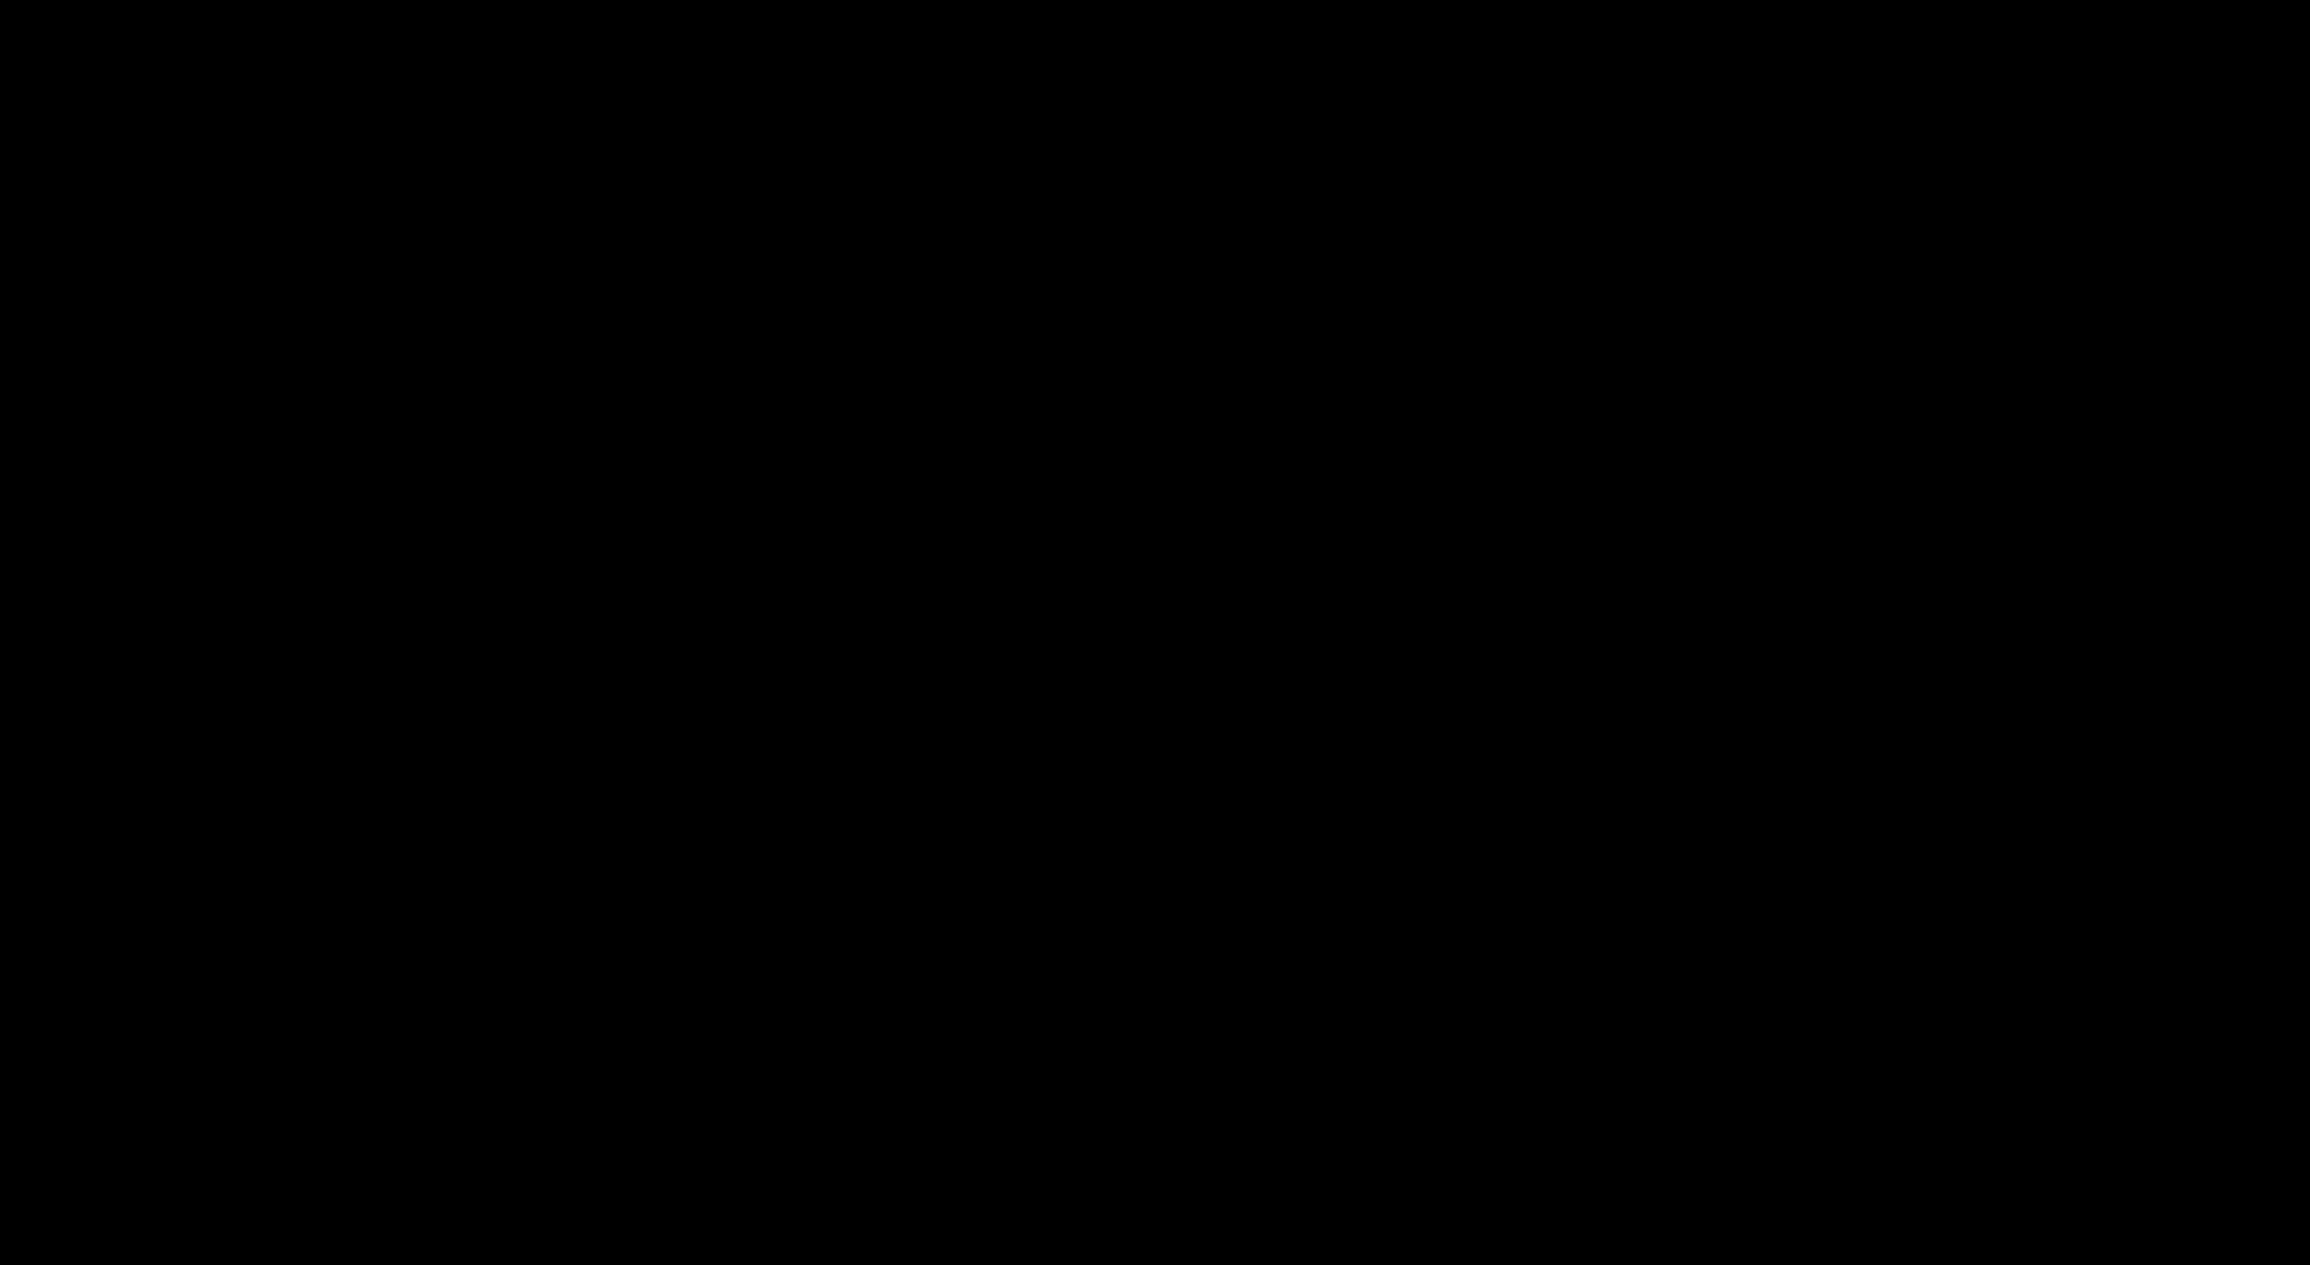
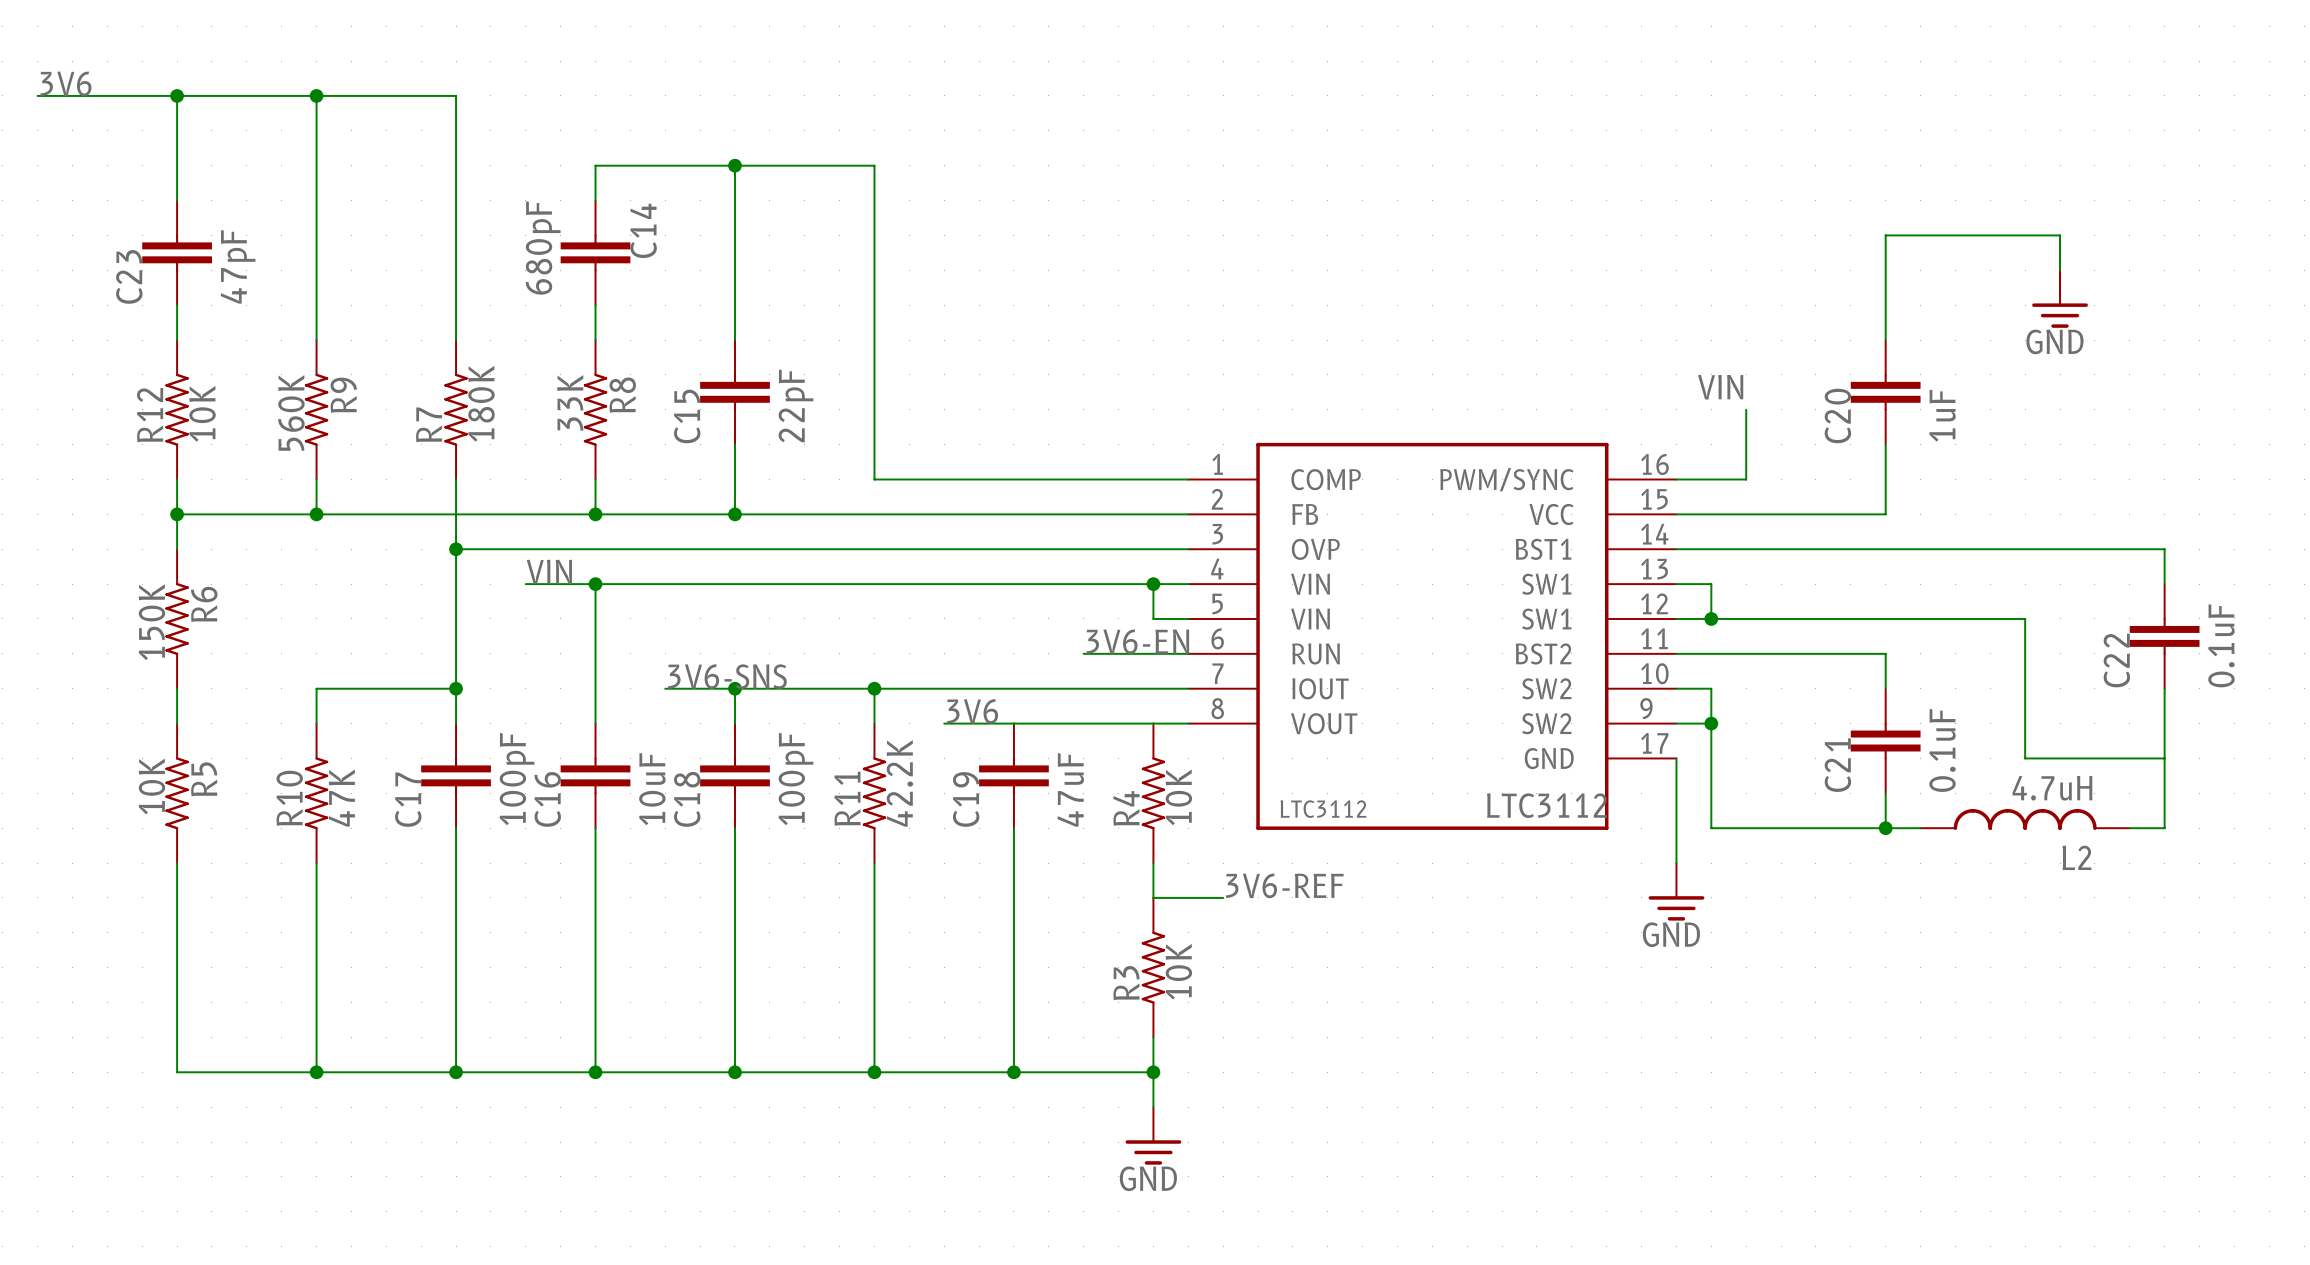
label: none -> 3V6 (65, 83)
wire: none -> (37, 95) (456, 95) (456, 340)
wire: none -> (177, 95) (177, 200)
junction: none -> (177, 95)
wire: none -> (316, 95) (316, 340)
junction: none -> (316, 95)
wire: none -> (734, 165) (734, 340)
junction: none -> (734, 165)
wire: none -> (595, 200) (595, 165) (874, 165) (874, 479) (1188, 479)
C23: none -> 47pF (177, 252)
C14: none -> 680pF (595, 252)
wire: none -> (2060, 270) (2060, 235) (1885, 235) (1885, 340)
power symbol: none -> GND (2060, 299)
wire: none -> (177, 305) (177, 340)
wire: none -> (595, 305) (595, 340)
label: none -> VIN (1720, 387)
C15: none -> 22pF (734, 392)
C20: none -> 1uF (1885, 392)
R12: none -> 10K (177, 409)
R9: none -> 560K (316, 409)
R7: none -> 180K (456, 409)
R8: none -> 33K (595, 409)
wire: none -> (1746, 409) (1746, 479) (1676, 479)
wire: none -> (734, 444) (734, 514)
wire: none -> (1885, 444) (1885, 514) (1676, 514)
wire: none -> (177, 479) (177, 549)
wire: none -> (316, 479) (316, 514)
wire: none -> (456, 479) (456, 723)
wire: none -> (595, 479) (595, 514)
wire: none -> (177, 514) (1188, 514)
junction: none -> (177, 514)
junction: none -> (316, 514)
junction: none -> (595, 514)
junction: none -> (734, 514)
wire: none -> (456, 549) (1188, 549)
junction: none -> (456, 549)
wire: none -> (1676, 549) (2164, 549) (2164, 584)
label: none -> VIN (549, 572)
wire: none -> (525, 584) (1188, 584)
wire: none -> (595, 584) (595, 723)
junction: none -> (595, 584)
wire: none -> (1153, 584) (1153, 618) (1188, 618)
junction: none -> (1153, 584)
wire: none -> (1676, 584) (1711, 584) (1711, 618)
R6: none -> 150K (177, 618)
wire: none -> (1676, 618) (2025, 618) (2025, 758) (2164, 758)
junction: none -> (1711, 618)
LTC3112: none -> (1432, 636)
C22: none -> 0.1uF (2164, 636)
label: none -> 3V6-EN (1137, 641)
wire: none -> (1083, 653) (1188, 653)
wire: none -> (1676, 653) (1885, 653) (1885, 688)
label: none -> 3V6-SNS (727, 676)
wire: none -> (177, 688) (177, 723)
wire: none -> (456, 688) (316, 688) (316, 723)
junction: none -> (456, 688)
wire: none -> (665, 688) (1188, 688)
wire: none -> (734, 688) (734, 723)
junction: none -> (734, 688)
wire: none -> (874, 688) (874, 723)
junction: none -> (874, 688)
wire: none -> (1676, 688) (1711, 688) (1711, 828) (1920, 828)
wire: none -> (2164, 688) (2164, 828) (2129, 828)
label: none -> 3V6 (972, 711)
wire: none -> (944, 723) (1188, 723)
wire: none -> (1676, 723) (1711, 723)
junction: none -> (1711, 723)
C21: none -> 0.1uF (1885, 741)
wire: none -> (1676, 758) (1676, 863)
C17: none -> 100pF (456, 775)
C16: none -> 10uF (595, 775)
C18: none -> 100pF (734, 775)
C19: none -> 47uF (1013, 775)
R5: none -> 10K (177, 793)
R10: none -> 47K (316, 793)
R11: none -> 42.2K (874, 793)
R4: none -> 10K (1153, 793)
wire: none -> (1885, 793) (1885, 828)
L2: none -> 4.7uH (2025, 819)
wire: none -> (456, 828) (456, 1072)
wire: none -> (595, 828) (595, 1072)
wire: none -> (734, 828) (734, 1072)
wire: none -> (1013, 828) (1013, 1072)
junction: none -> (1885, 828)
wire: none -> (177, 863) (177, 1072) (1153, 1072)
wire: none -> (316, 863) (316, 1072)
wire: none -> (874, 863) (874, 1072)
wire: none -> (1153, 863) (1153, 897) (1223, 897)
label: none -> 3V6-REF (1284, 885)
power symbol: none -> GND (1676, 891)
R3: none -> 10K (1153, 967)
wire: none -> (1153, 1037) (1153, 1107)
junction: none -> (316, 1072)
junction: none -> (456, 1072)
junction: none -> (595, 1072)
junction: none -> (734, 1072)
junction: none -> (874, 1072)
junction: none -> (1013, 1072)
junction: none -> (1153, 1072)
power symbol: none -> GND (1153, 1135)

